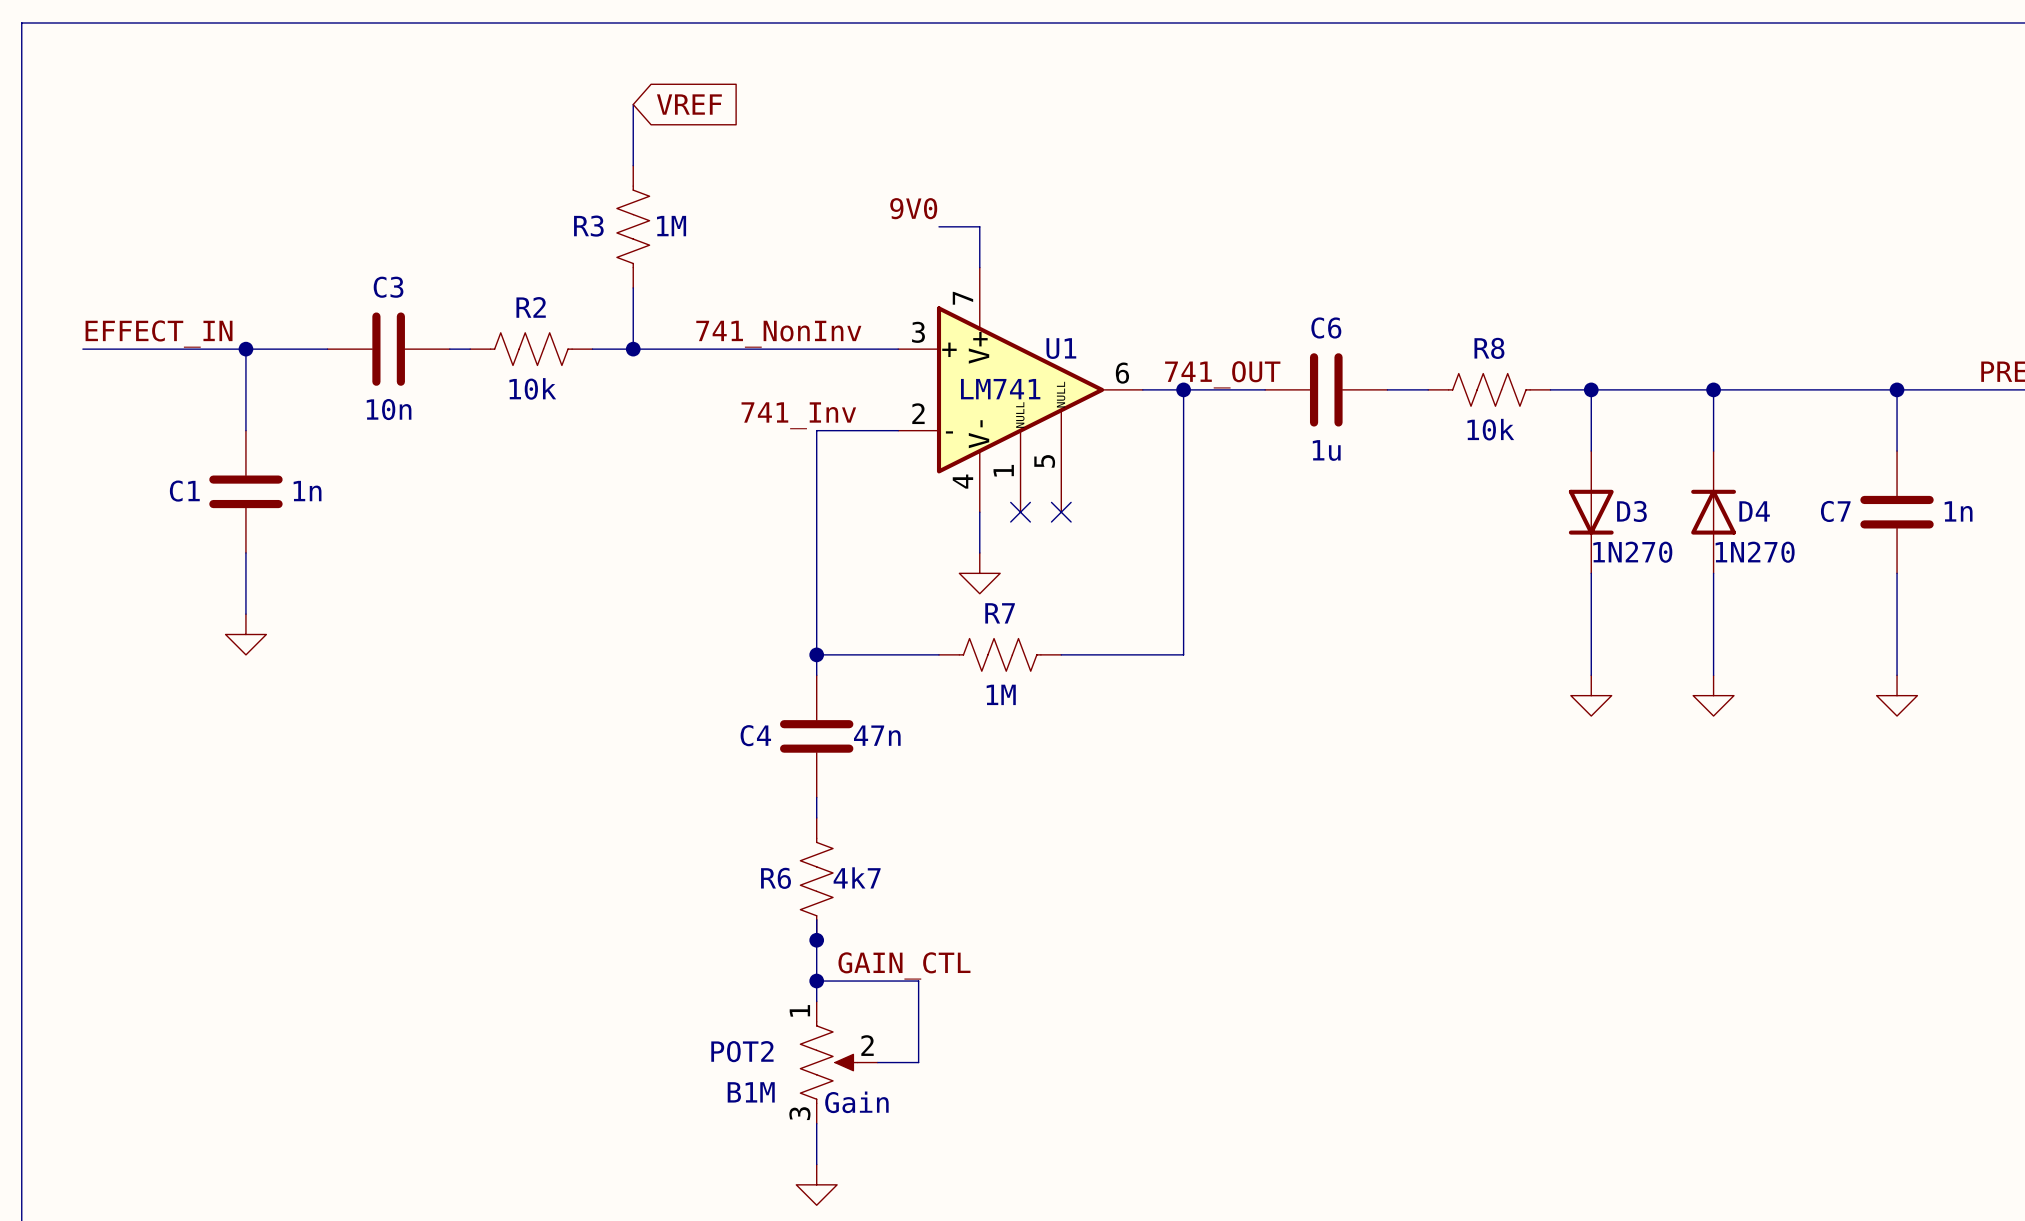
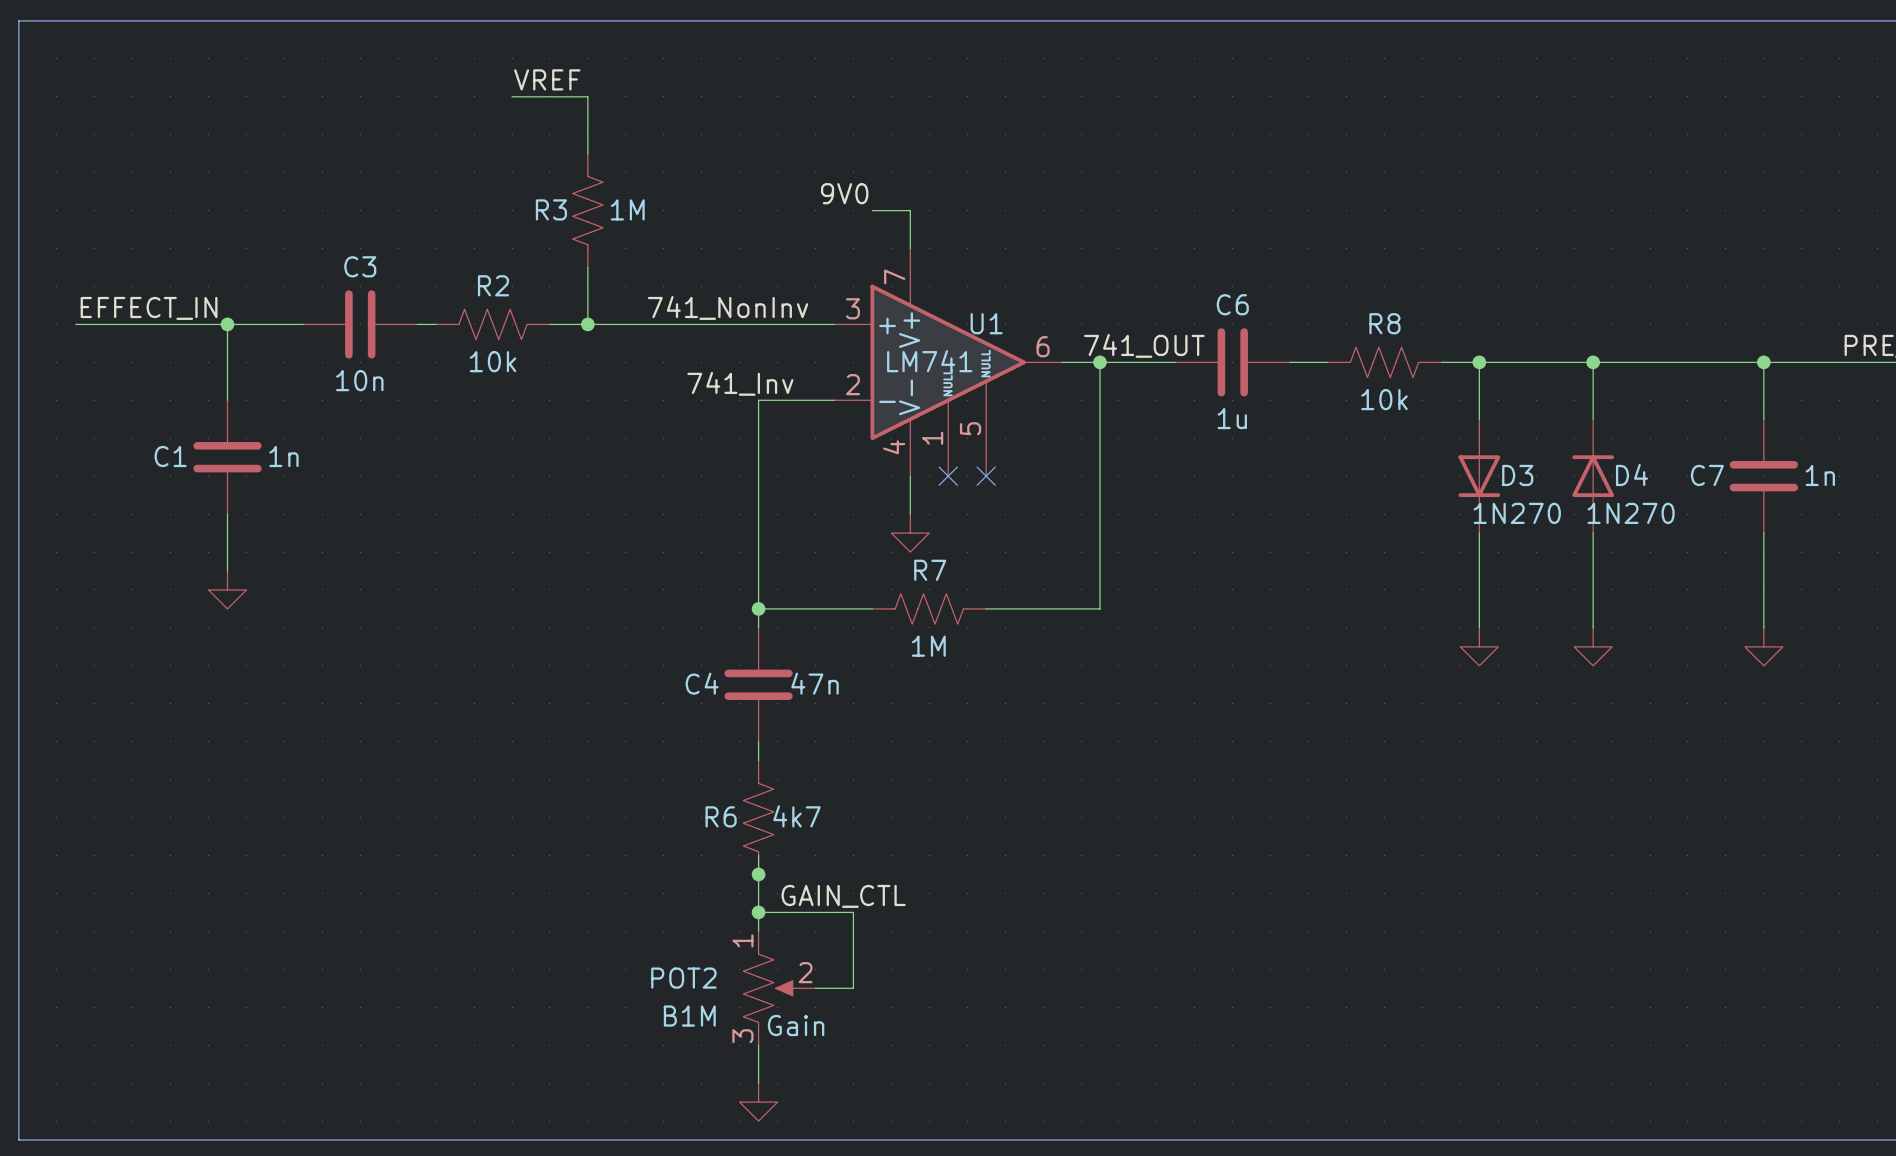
label: none -> VREF (547, 79)
wire: none -> (512, 96) (587, 96)
global label: VREF (689, 104) -> none

